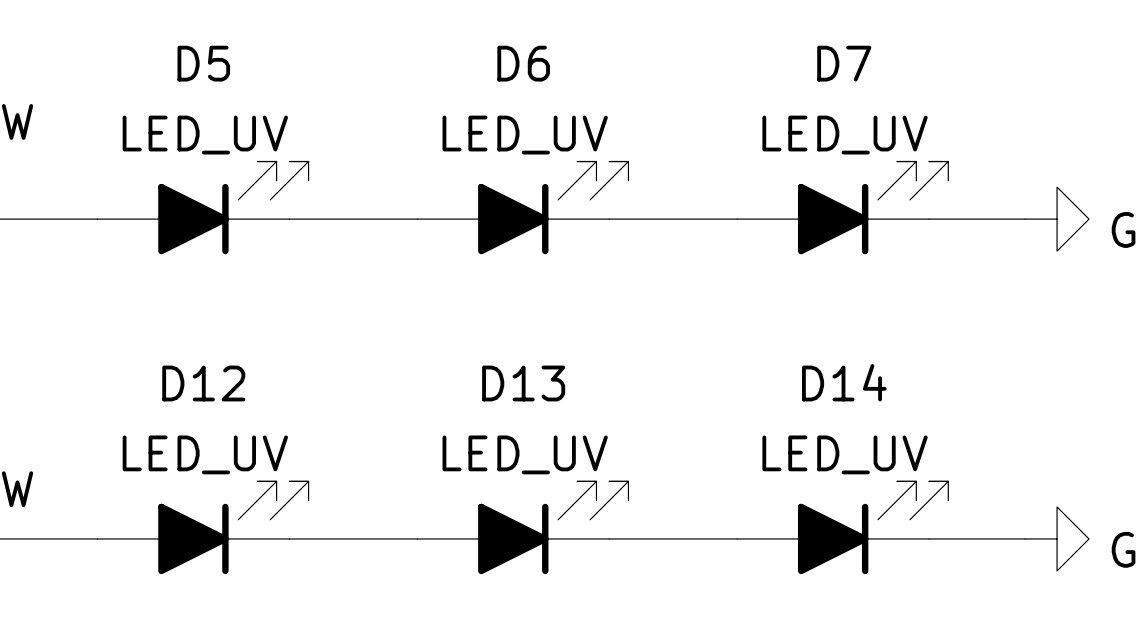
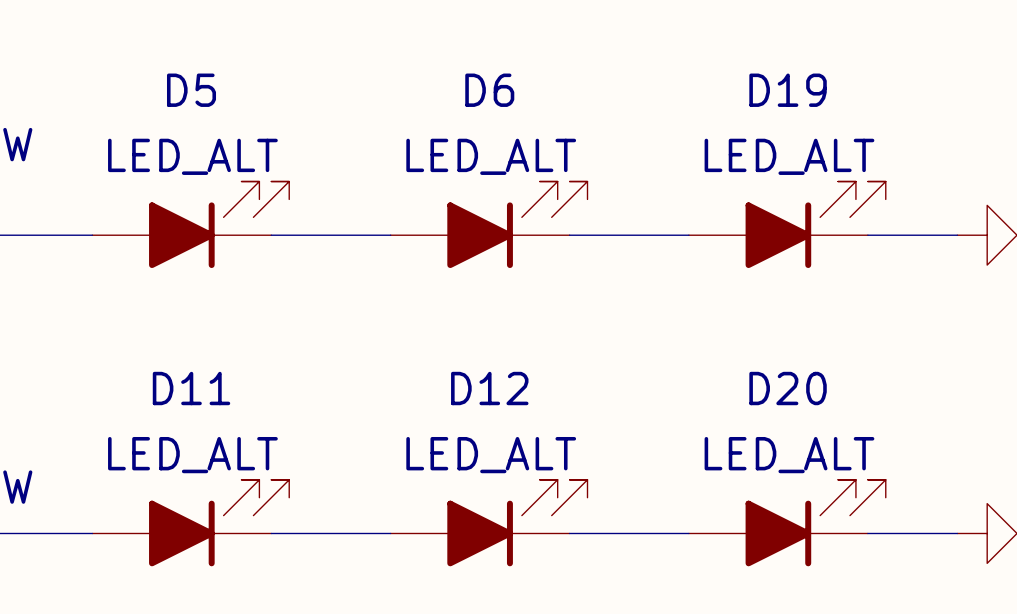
D7 name: D7 (844, 63) -> D19 (788, 90)
D5 value: LED_UV (205, 135) -> LED_ALT (192, 156)
D6 value: LED_UV (525, 135) -> LED_ALT (491, 156)
D7 value: LED_UV (845, 135) -> LED_ALT (789, 156)
D14 name: D14 (844, 382) -> D20 (788, 388)
D12 name: D12 (203, 383) -> D11 (191, 388)
D13 name: D13 (523, 383) -> D12 (489, 388)
D12 value: LED_UV (205, 454) -> LED_ALT (192, 455)
D13 value: LED_UV (525, 454) -> LED_ALT (491, 455)
D14 value: LED_UV (845, 454) -> LED_ALT (789, 455)

